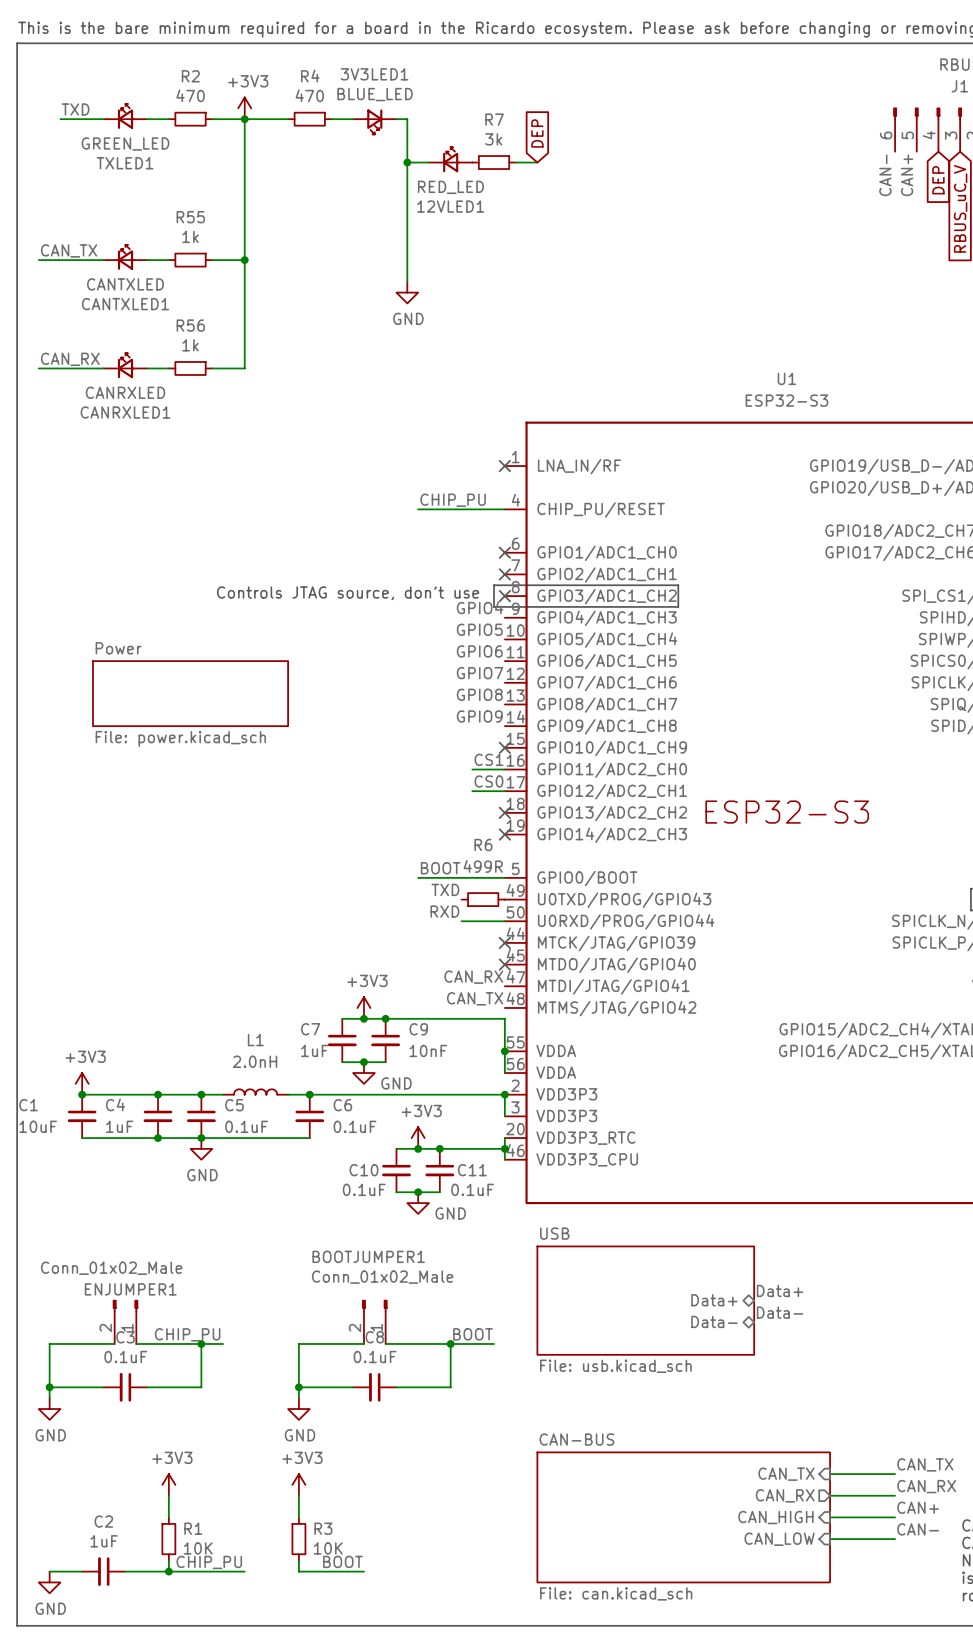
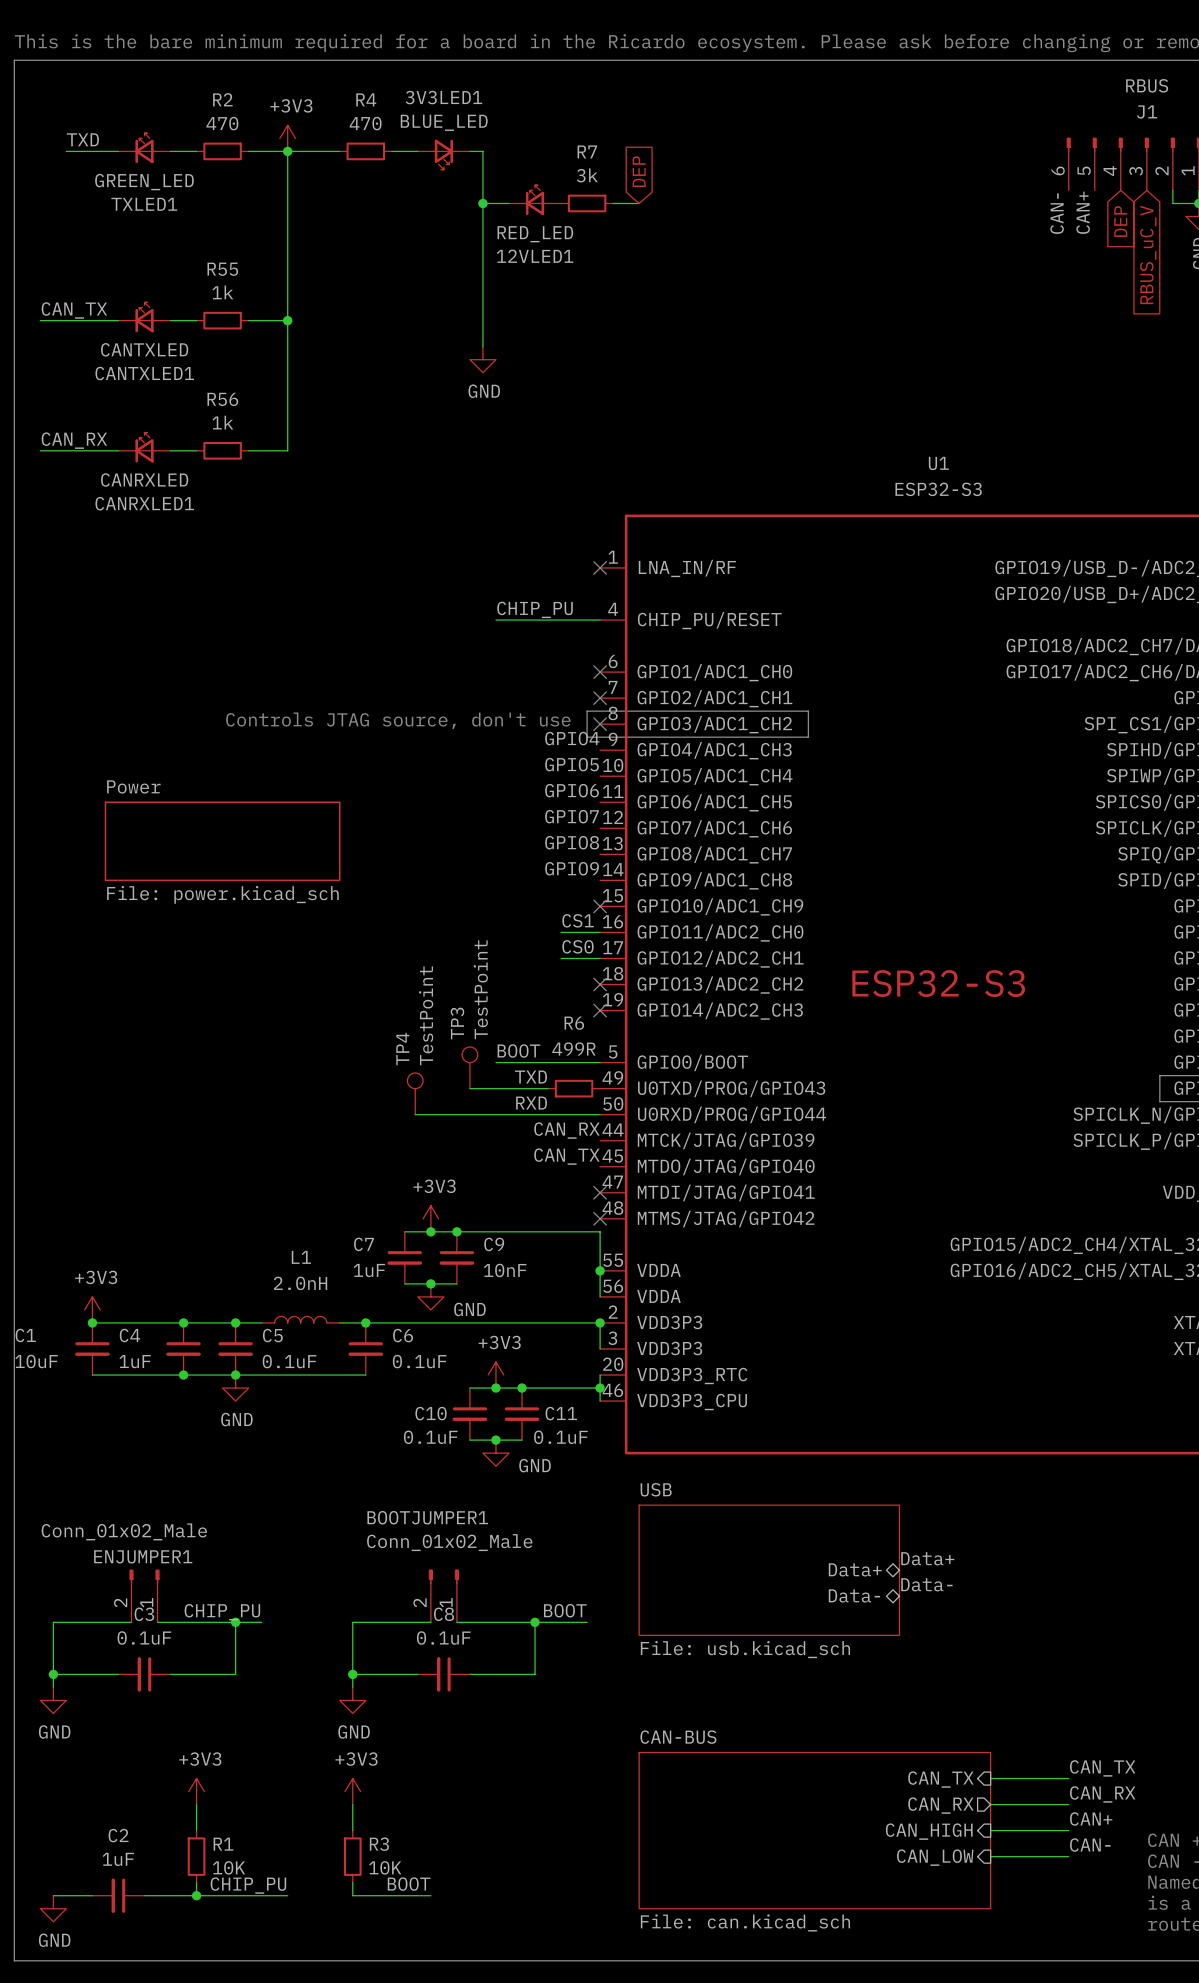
TP3: none -> TestPoint (469, 1067)
wire: none -> (469, 1088) (548, 1088)
TP4: none -> TestPoint (415, 1093)
wire: none -> (415, 1114) (548, 1114)
no-connect mark: (504, 942) -> none
no-connect mark: (504, 964) -> none
label position: CAN_RX (473, 977) -> CAN_RX (566, 1130)
no-connect mark: none -> (600, 1192)
label position: CAN_TX (475, 998) -> CAN_TX (566, 1156)
no-connect mark: none -> (600, 1218)

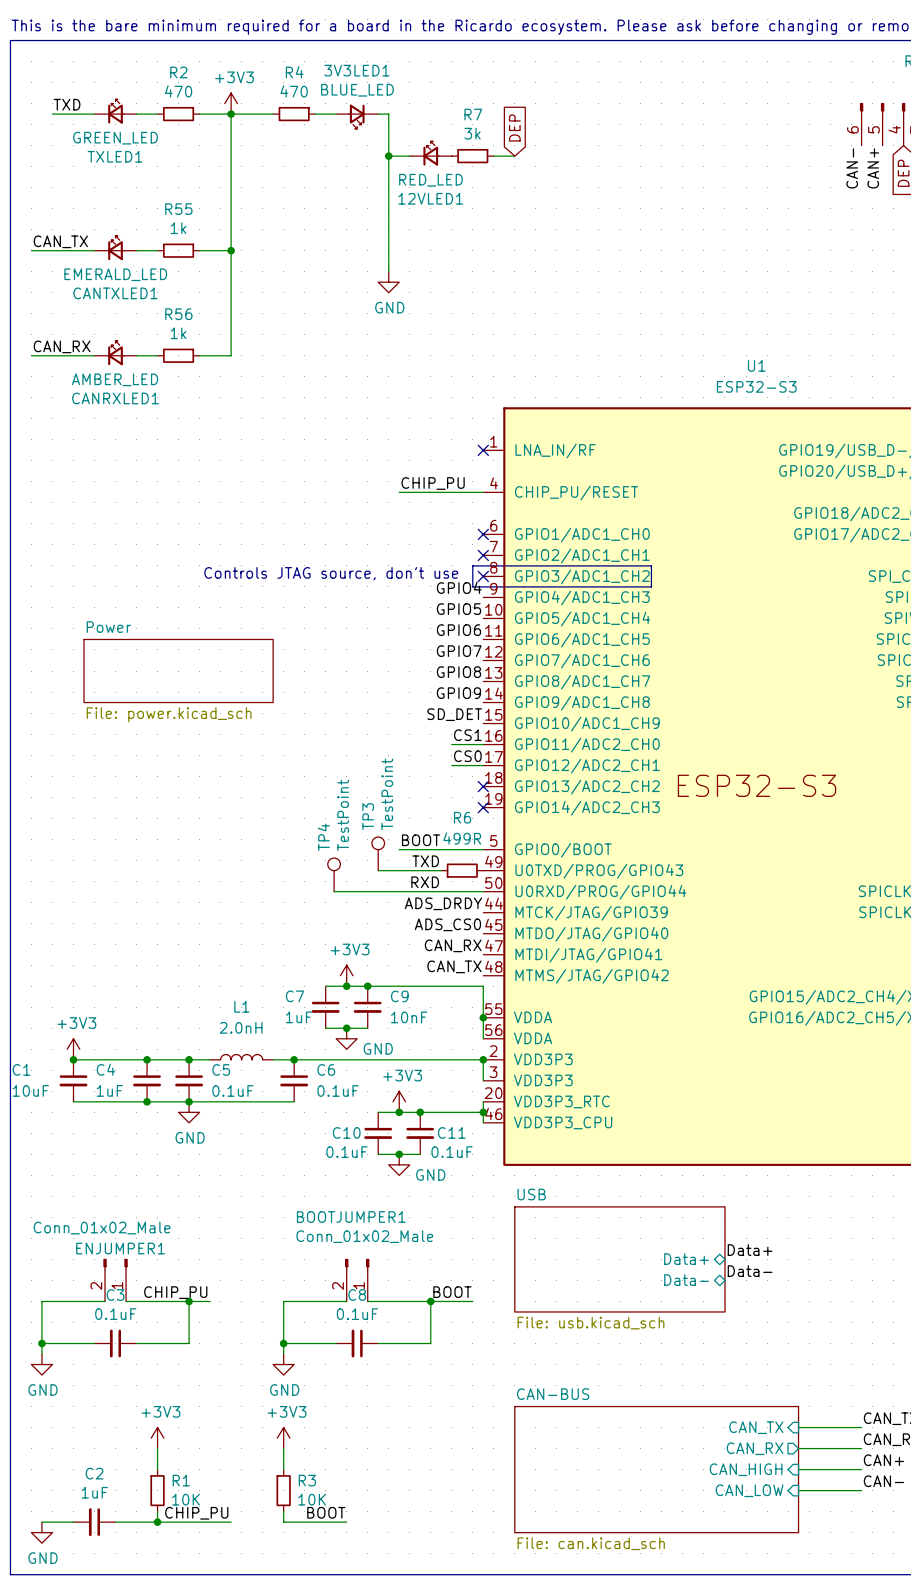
CANTXLED1 value: CANTXLED (144, 349) -> EMERALD_LED (115, 274)
CANRXLED1 value: CANRXLED (144, 480) -> AMBER_LED (115, 379)
label: none -> SD_DET (454, 714)
no-connect mark: (600, 906) -> none
label: CAN_RX (566, 1130) -> ADS_DRDY (443, 903)
label: CAN_TX (566, 1156) -> ADS_CS0 (447, 924)
label: none -> CAN_RX (453, 945)
no-connect mark: (600, 1192) -> none
label: none -> CAN_TX (454, 966)
no-connect mark: (600, 1218) -> none

